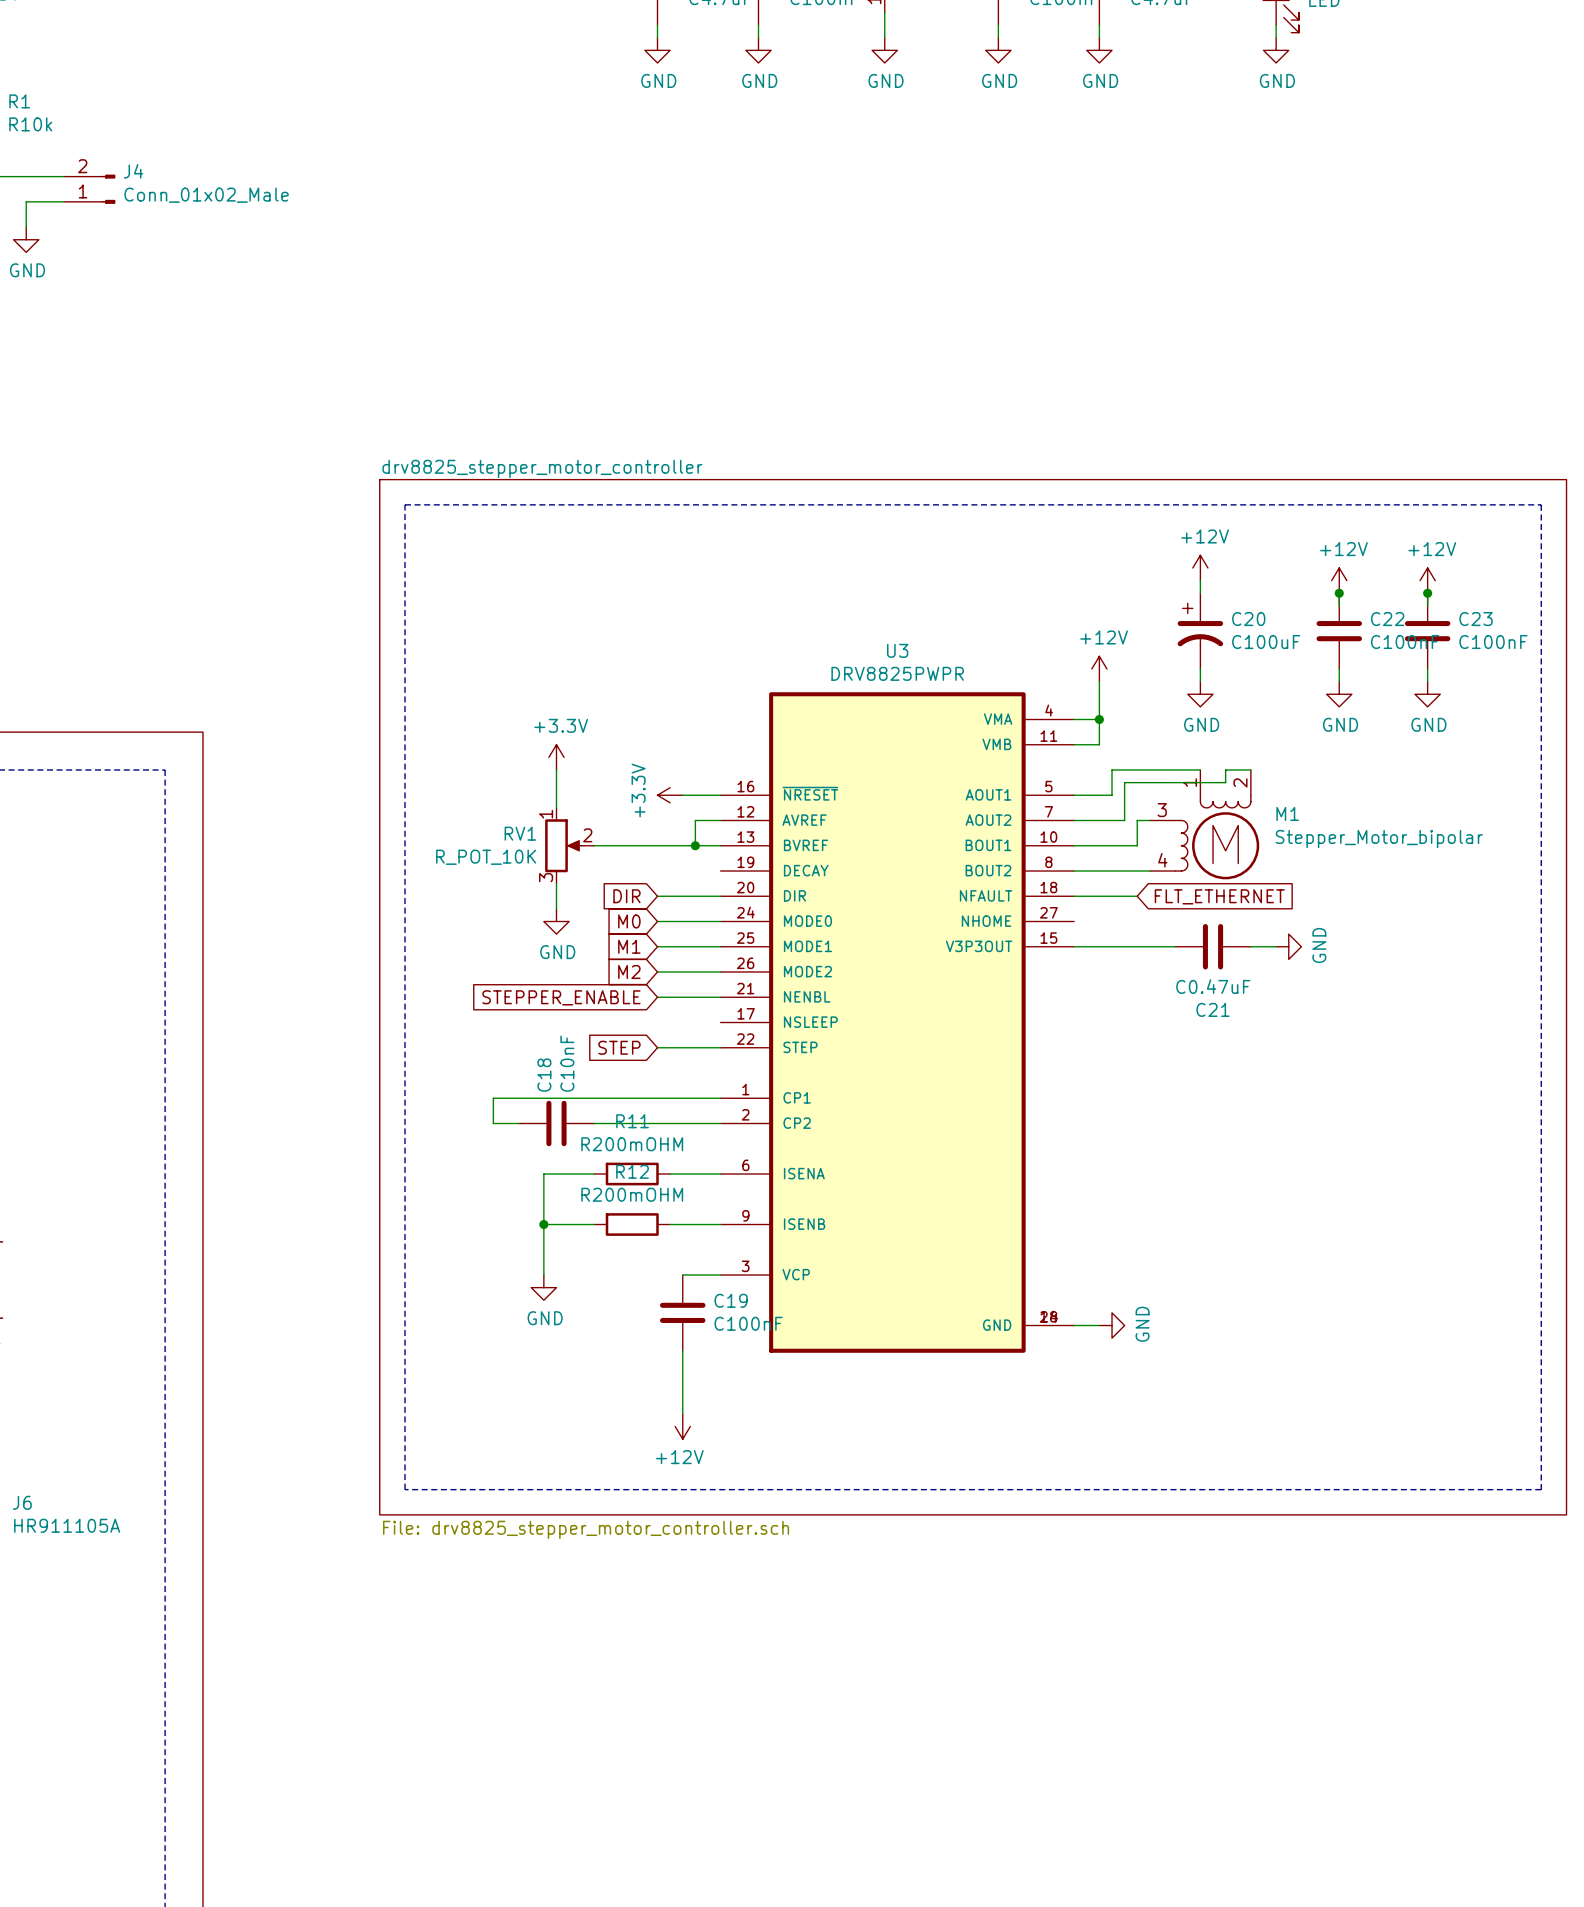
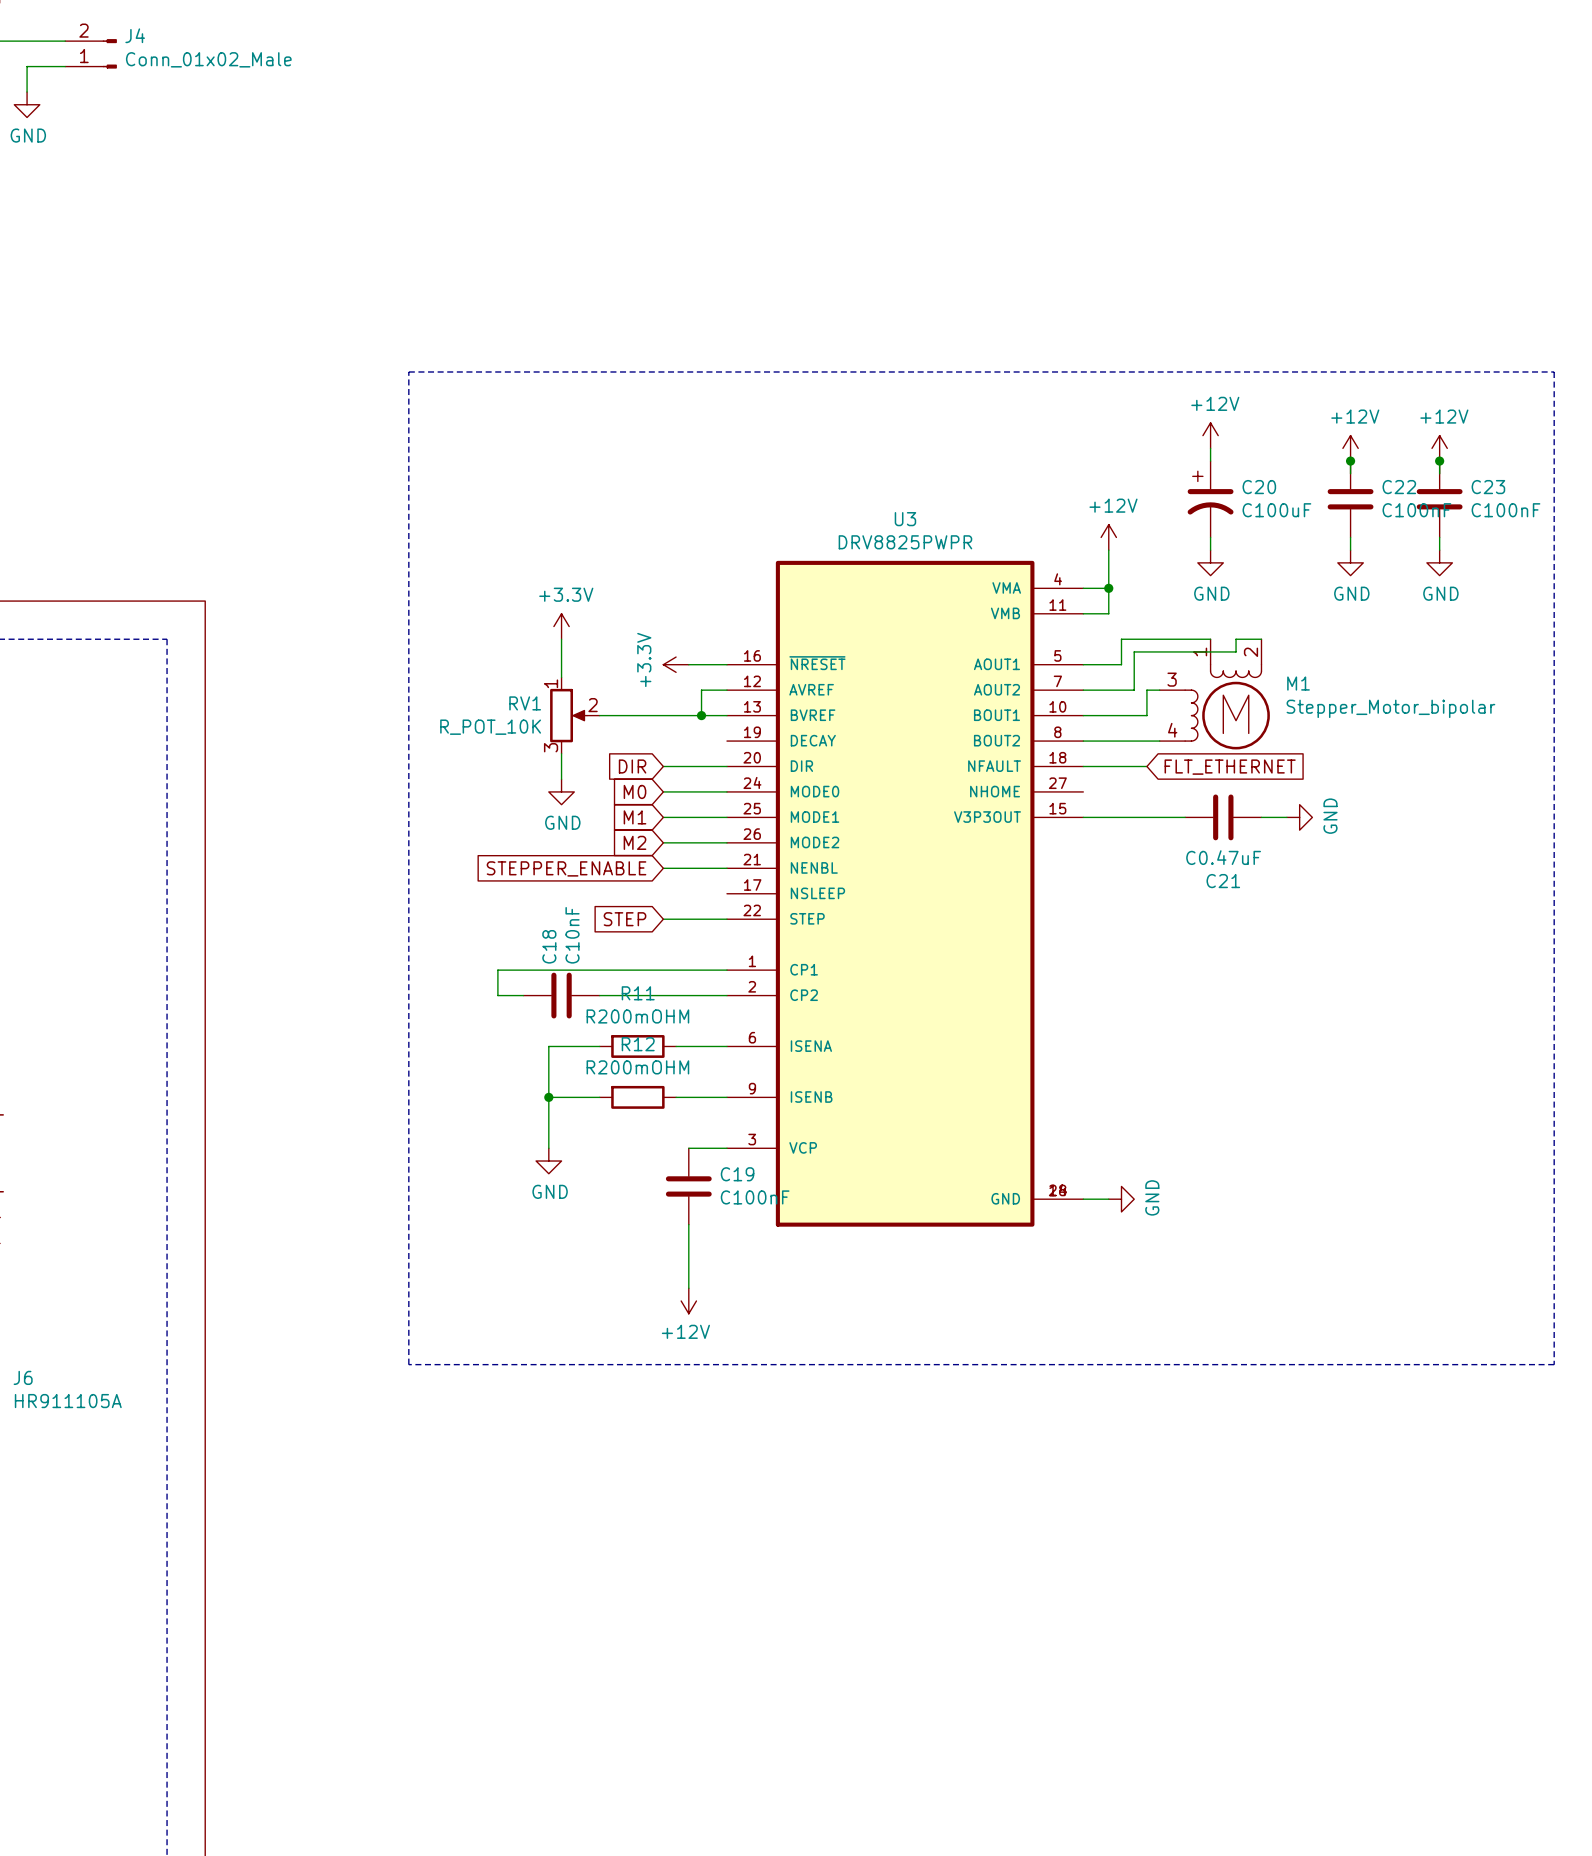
sheet drv8825_stepper_motor_controller: File: drv8825_stepper_motor_controller.sch (973, 997) -> none

